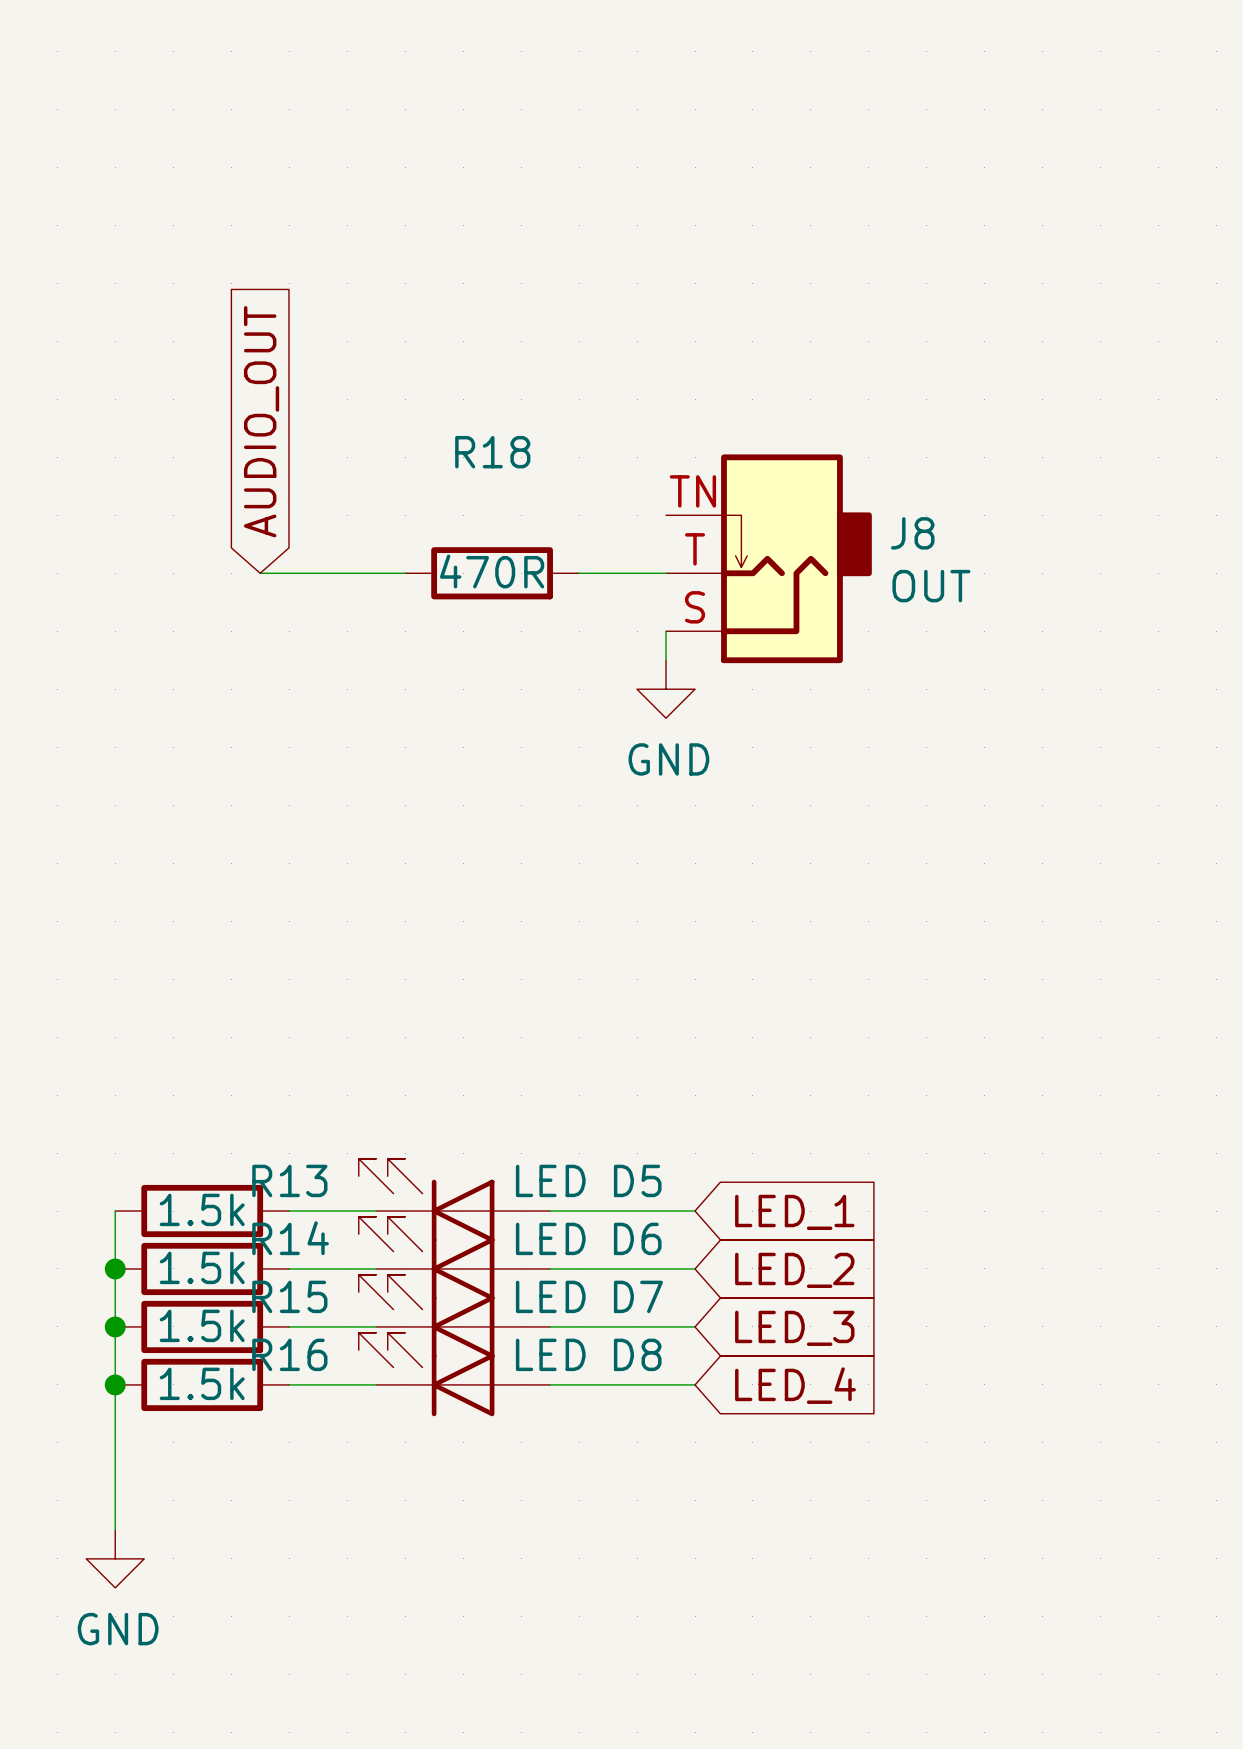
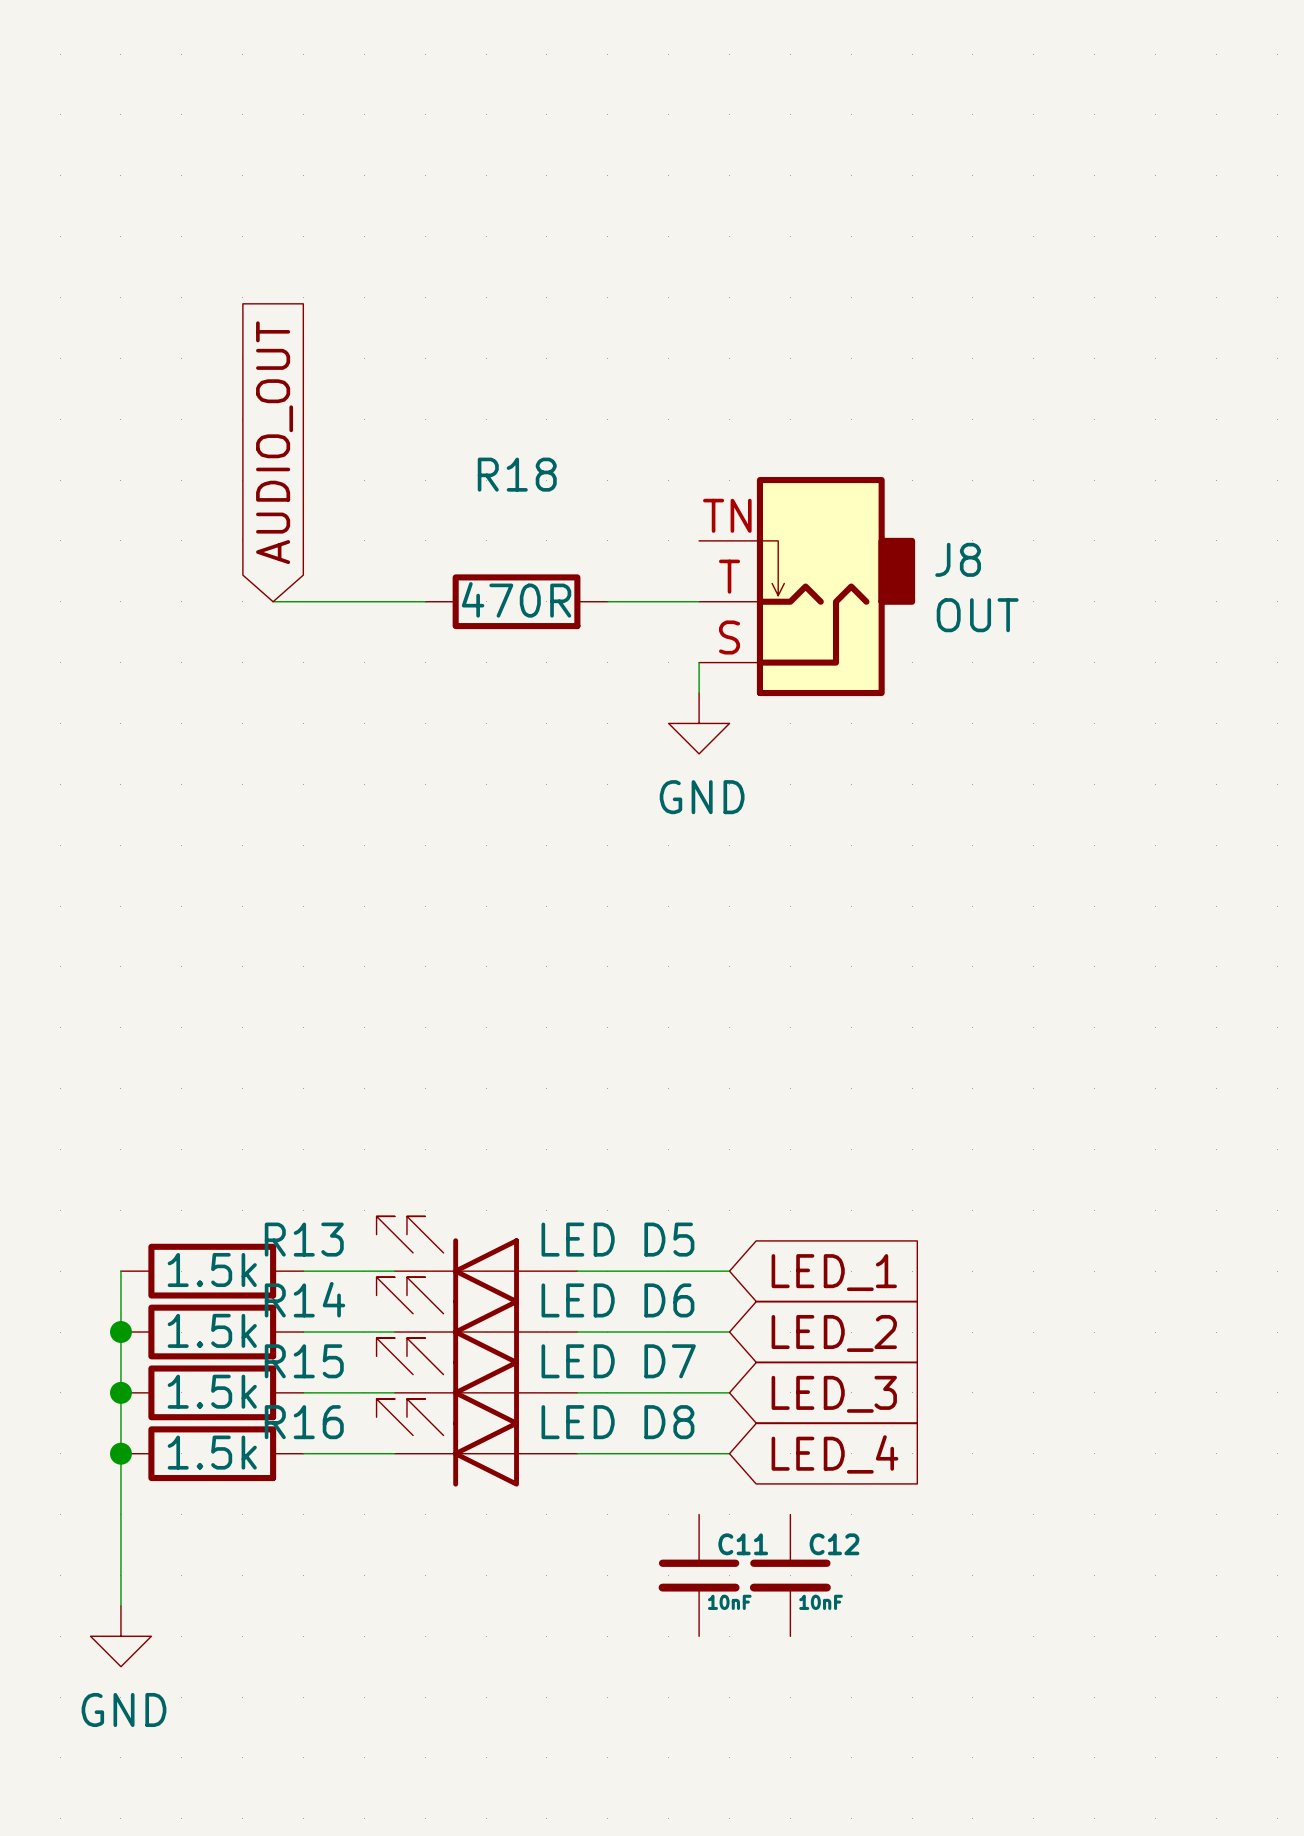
C11: none -> 10nF (699, 1575)
C12: none -> 10nF (790, 1575)

